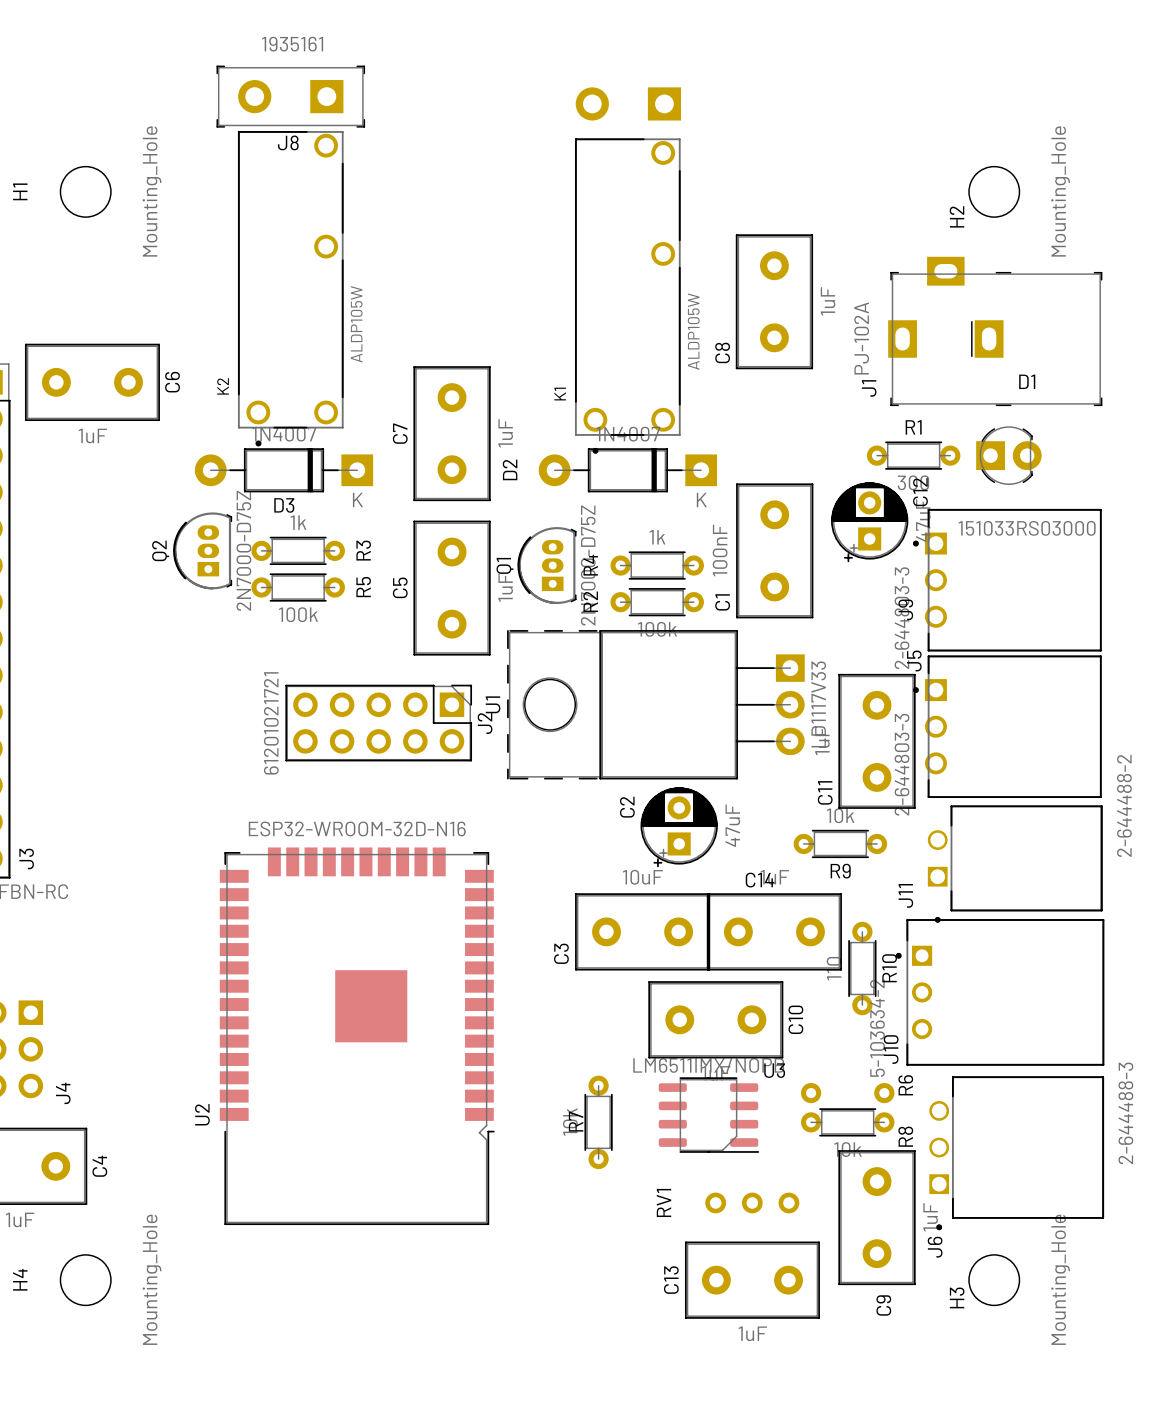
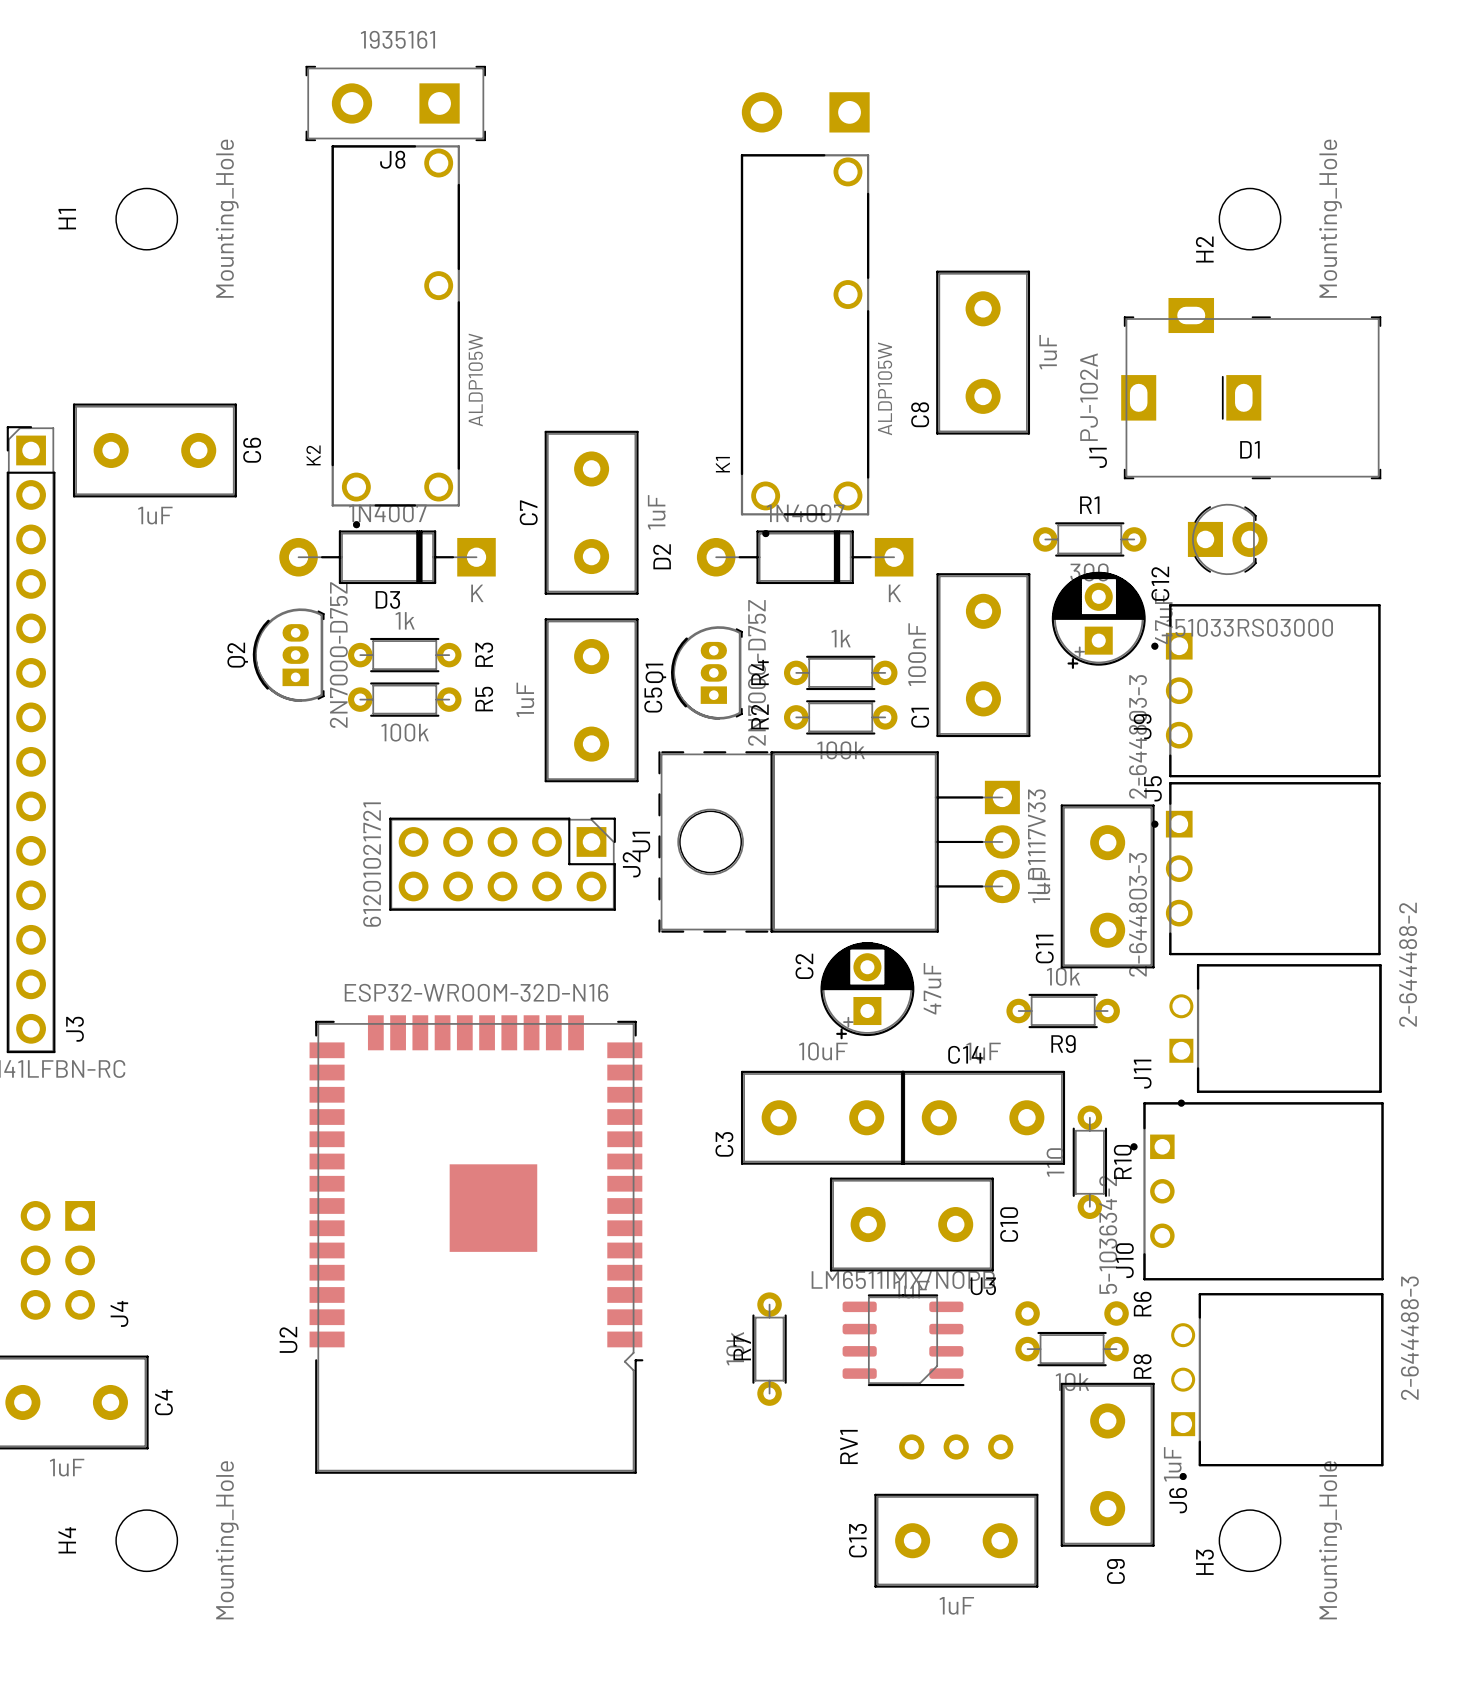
R1 position: (913, 455) -> (1089, 539)
D1 position: (1008, 455) -> (1227, 539)
C5 name position: C5 (400, 587) -> C5 (653, 700)
C5 value position: 1uF (505, 587) -> 1uF (525, 699)

